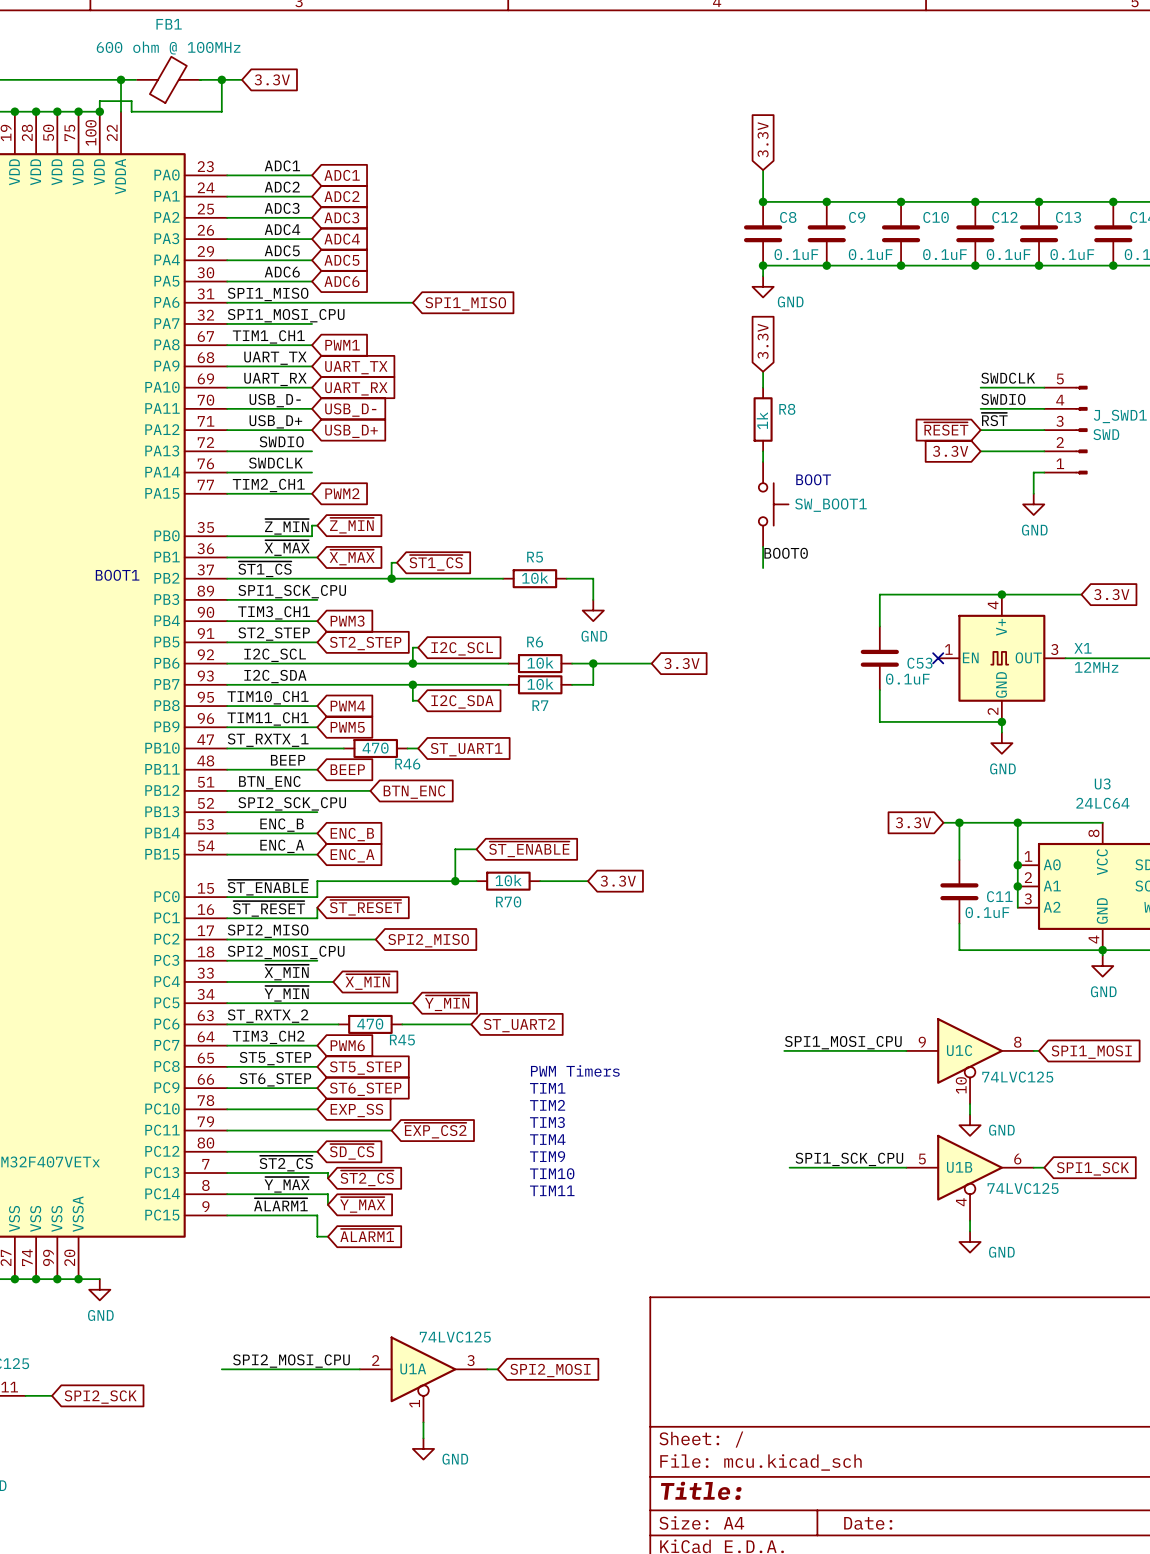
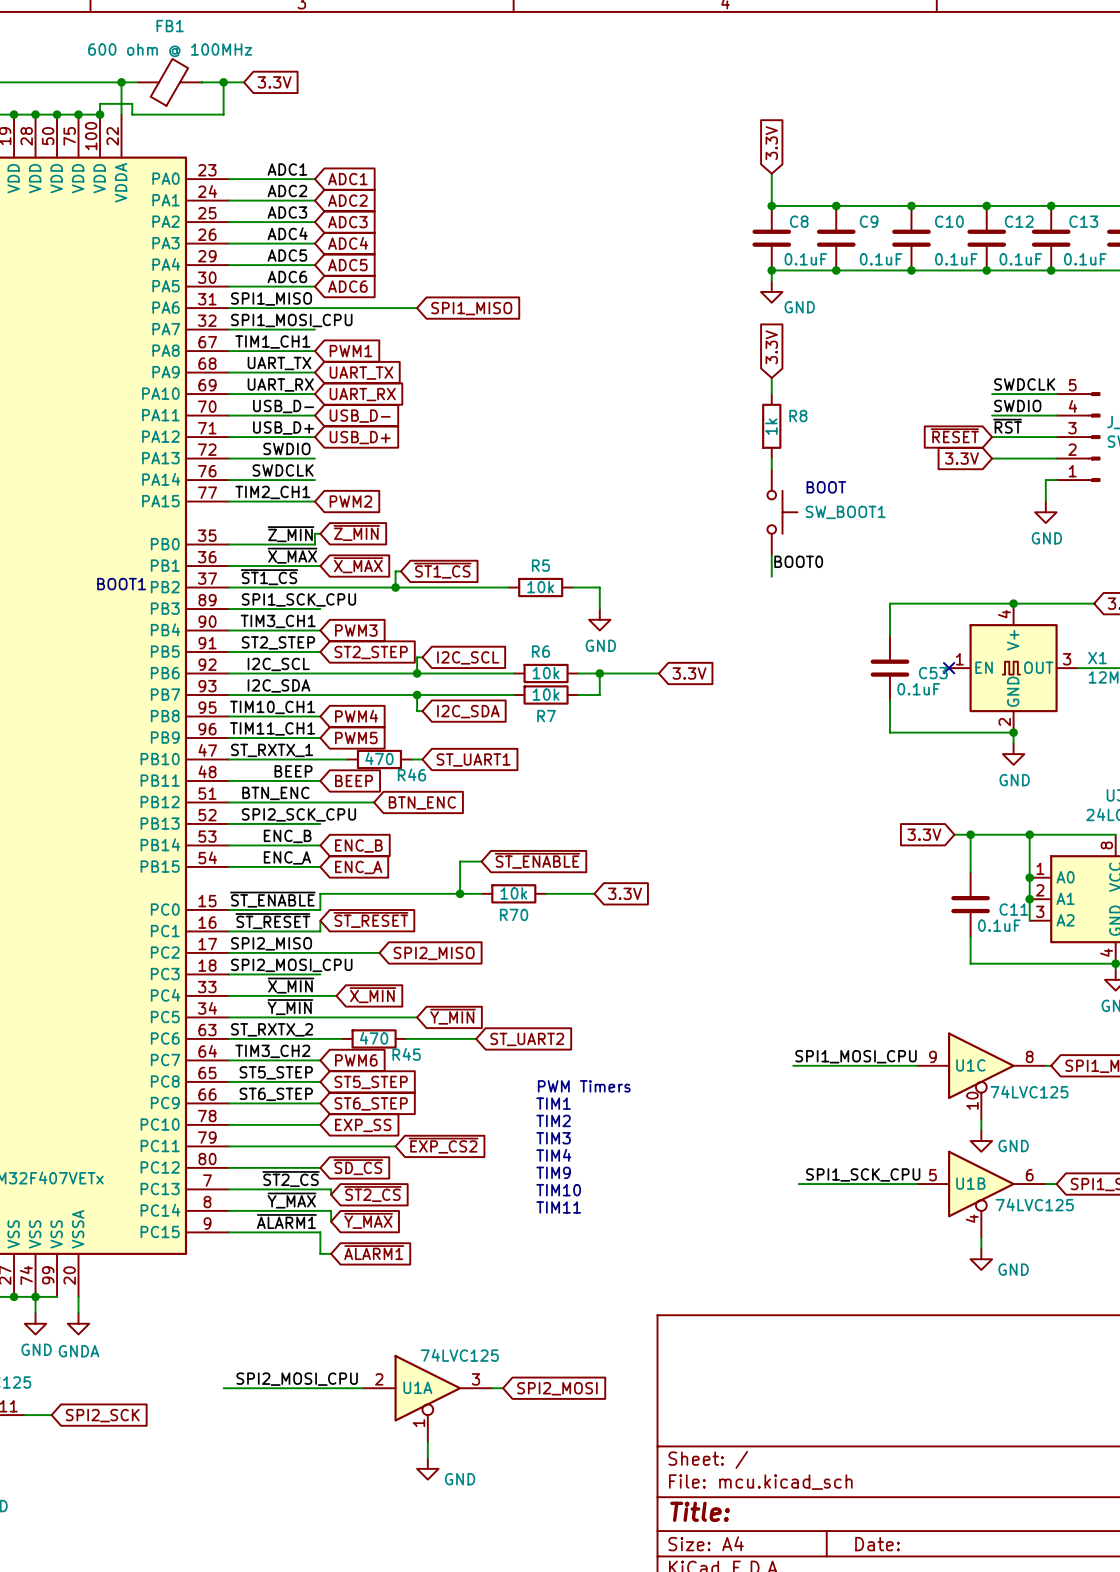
wire: none -> (35, 1296) (35, 1313)
wire: (57, 1279) (99, 1279) -> none
junction: (57, 1279) -> none
wire: none -> (78, 1296) (78, 1313)
junction: (78, 1279) -> none
power symbol position: GND (99, 1289) -> GND (35, 1323)
power symbol: none -> GNDA (78, 1323)

